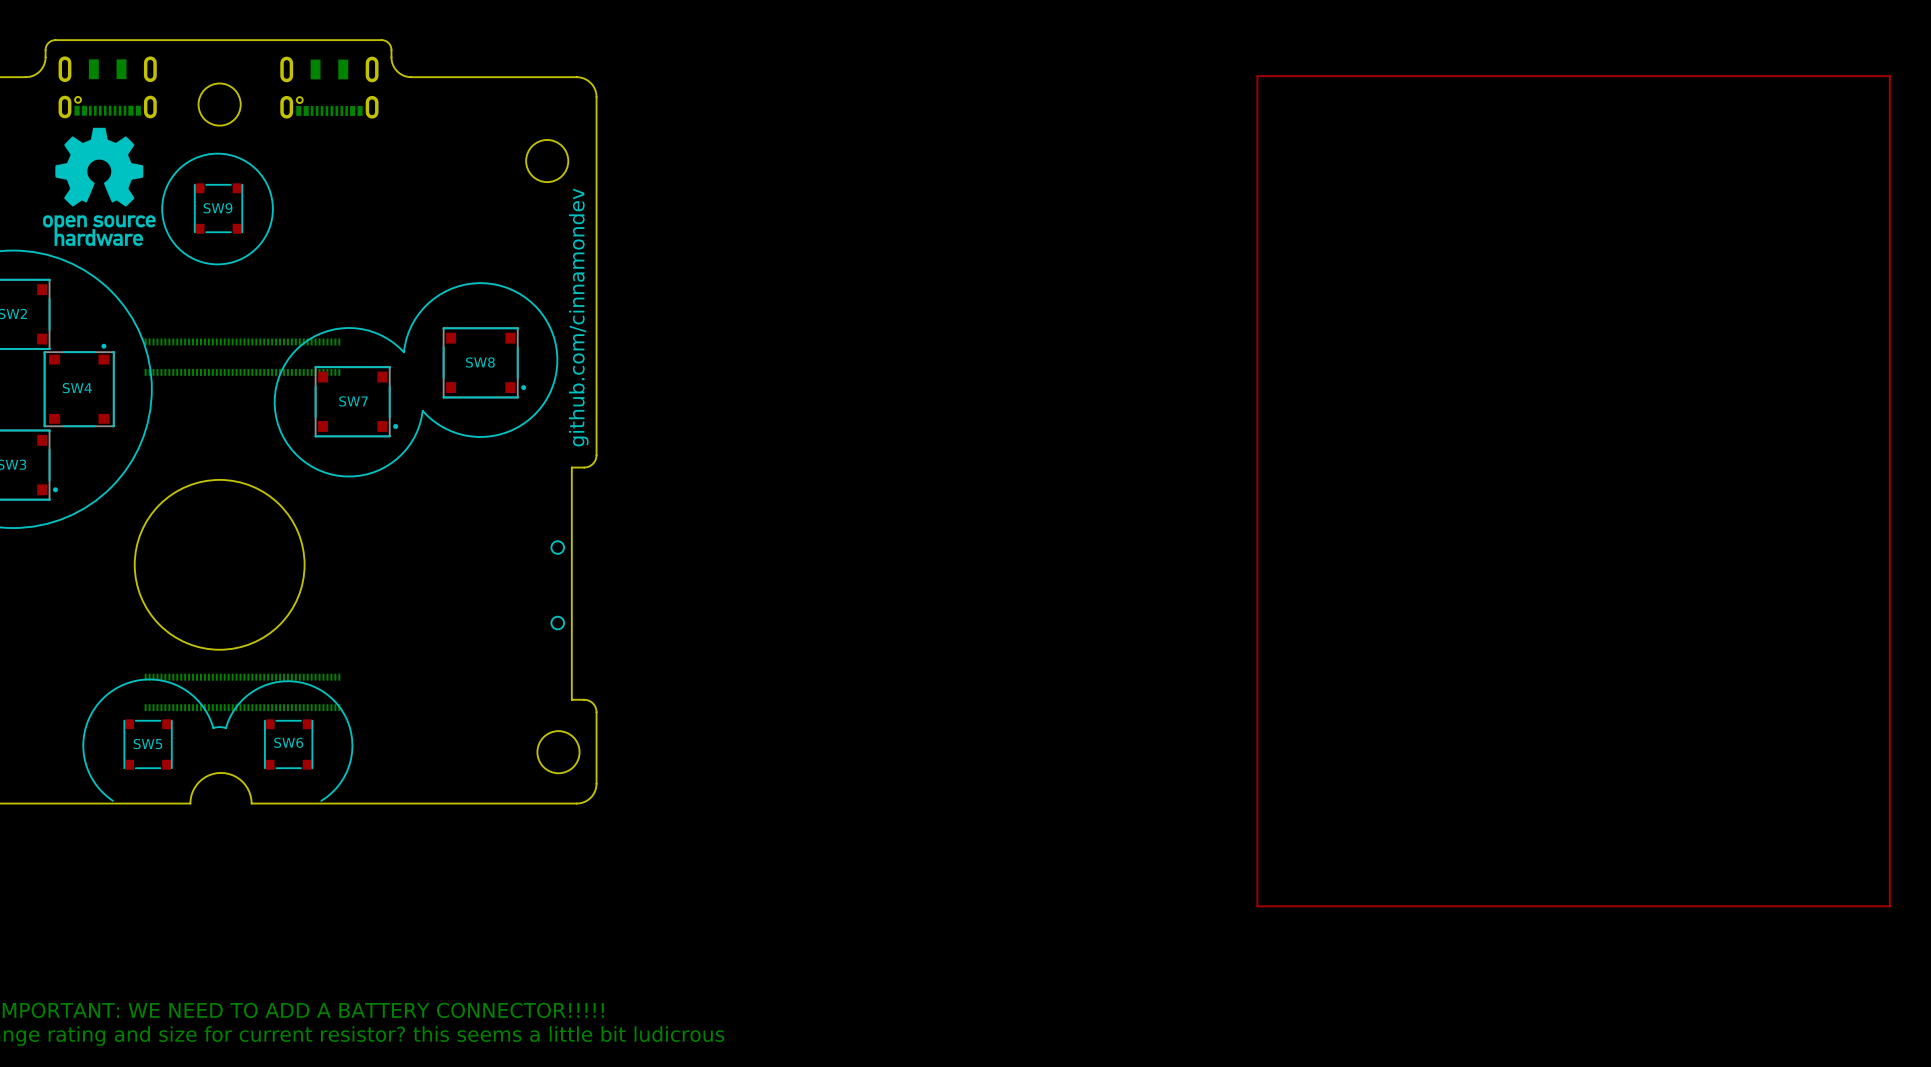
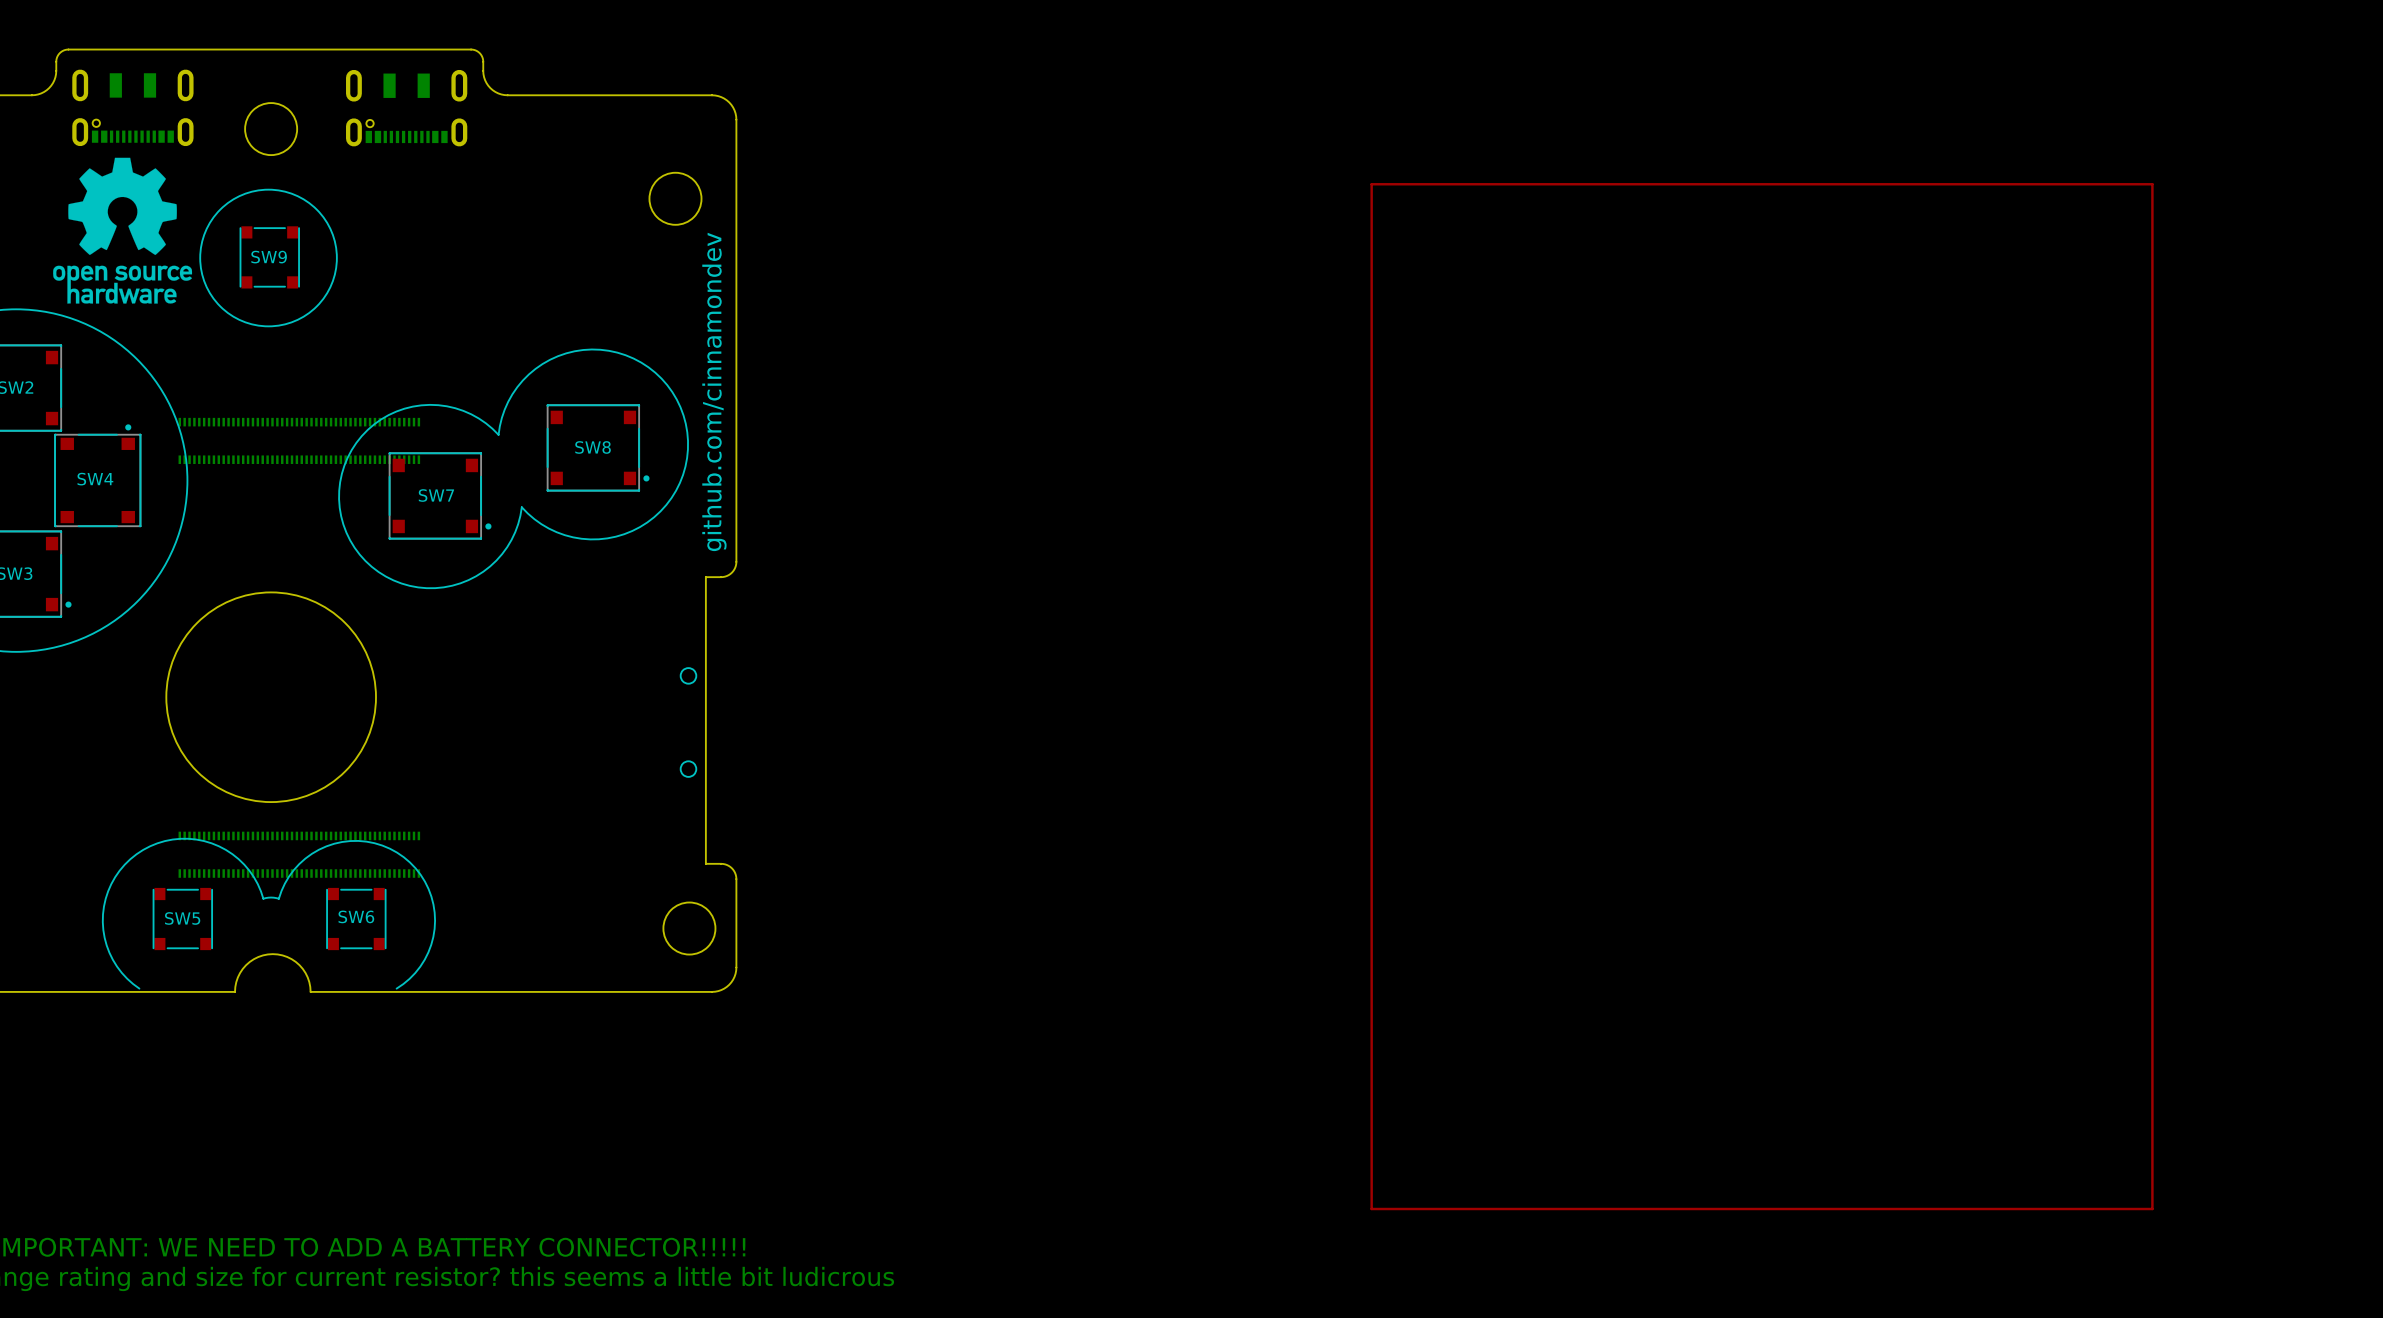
top track: (1257, 76) (1889, 76) (1889, 906) (1257, 906) (1257, 76) -> (1371, 184) (1371, 1209) (2152, 1209) (2152, 184) (1371, 184)

